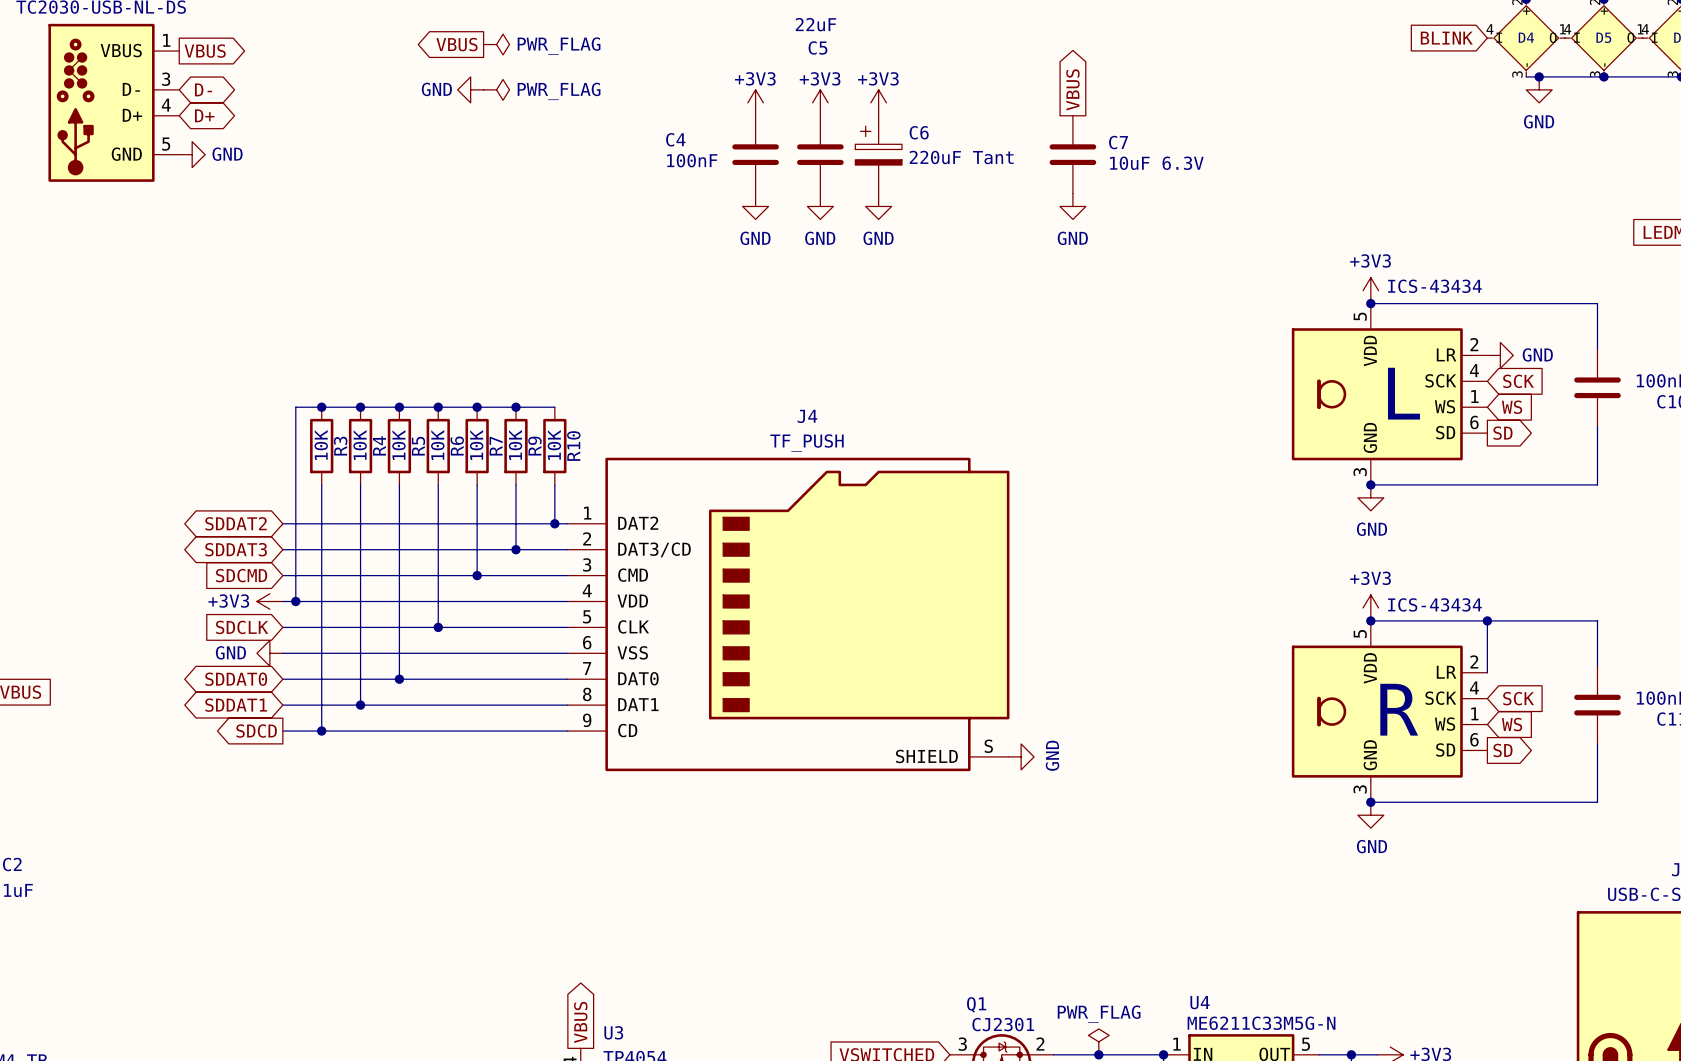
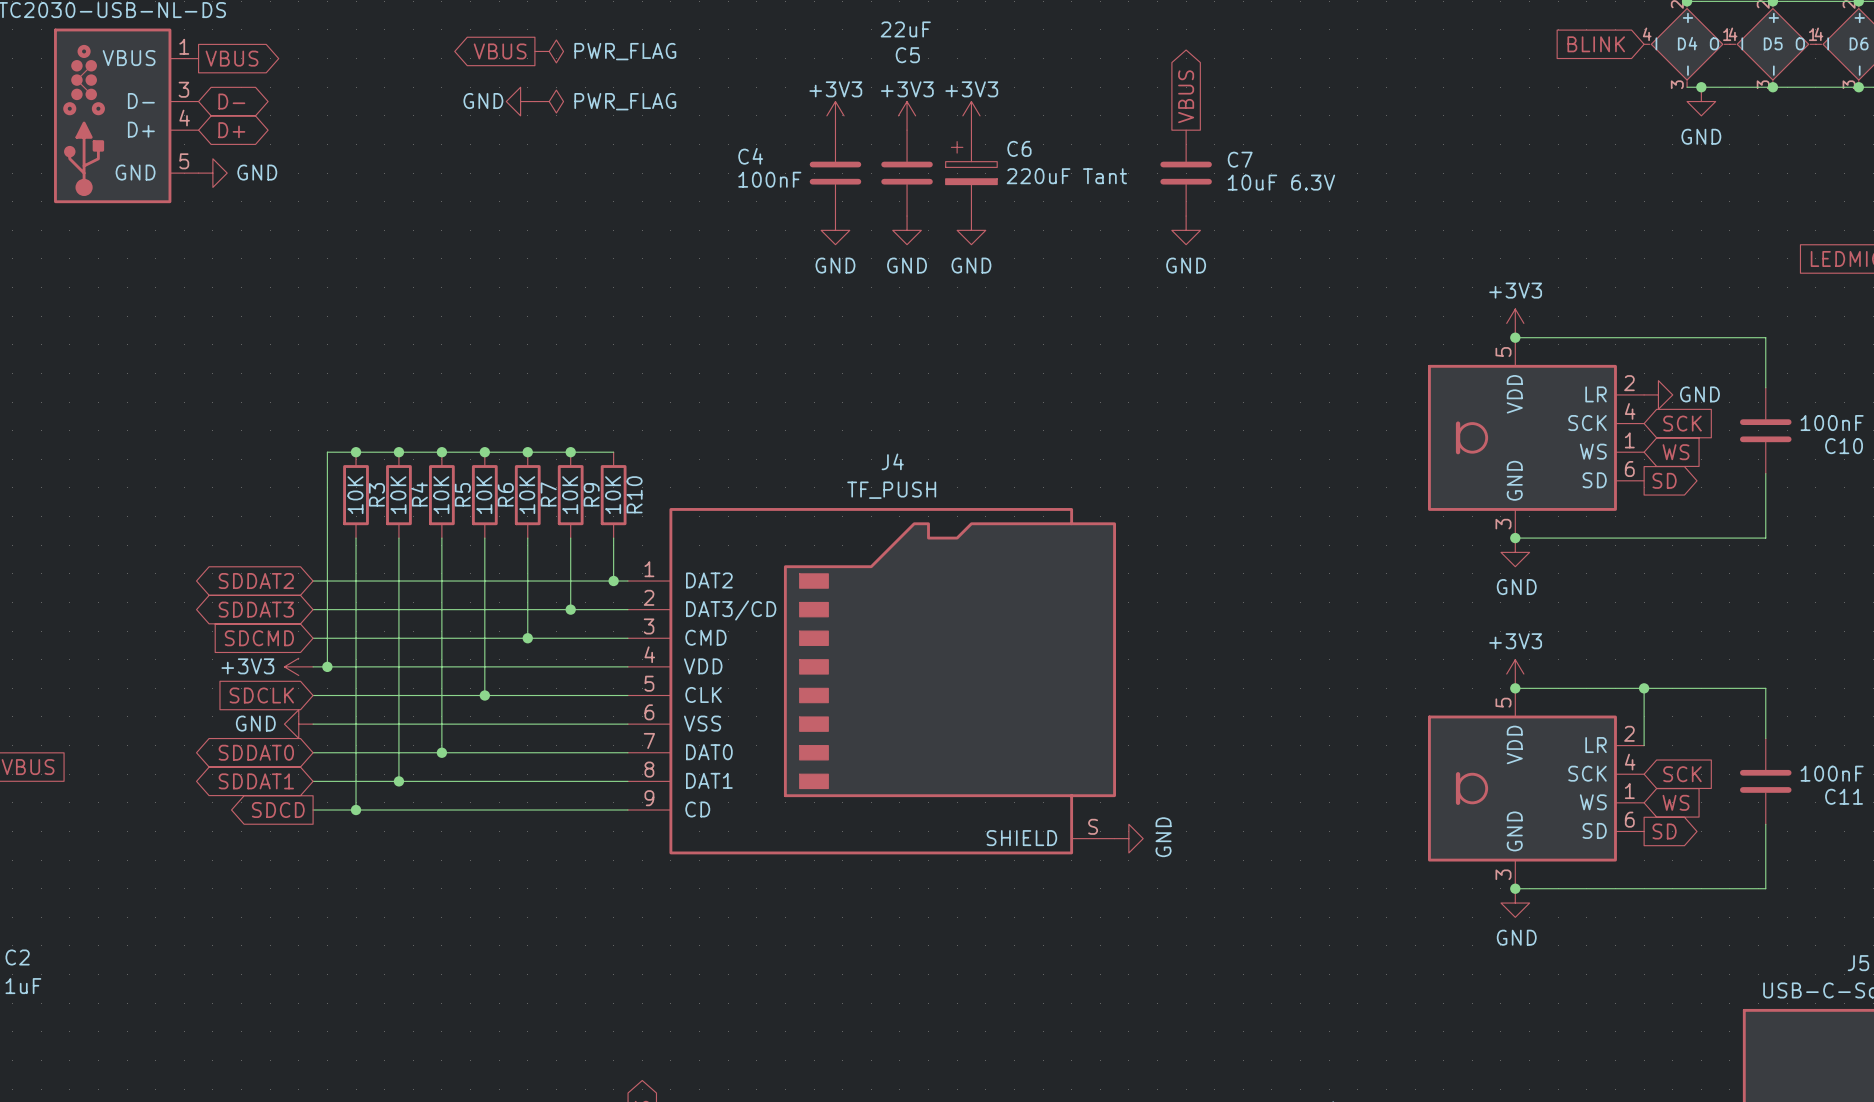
part value: ICS-43434 (1434, 286) -> none
text: L (1404, 393) -> none
part value: ICS-43434 (1434, 604) -> none
text: R (1399, 709) -> none

